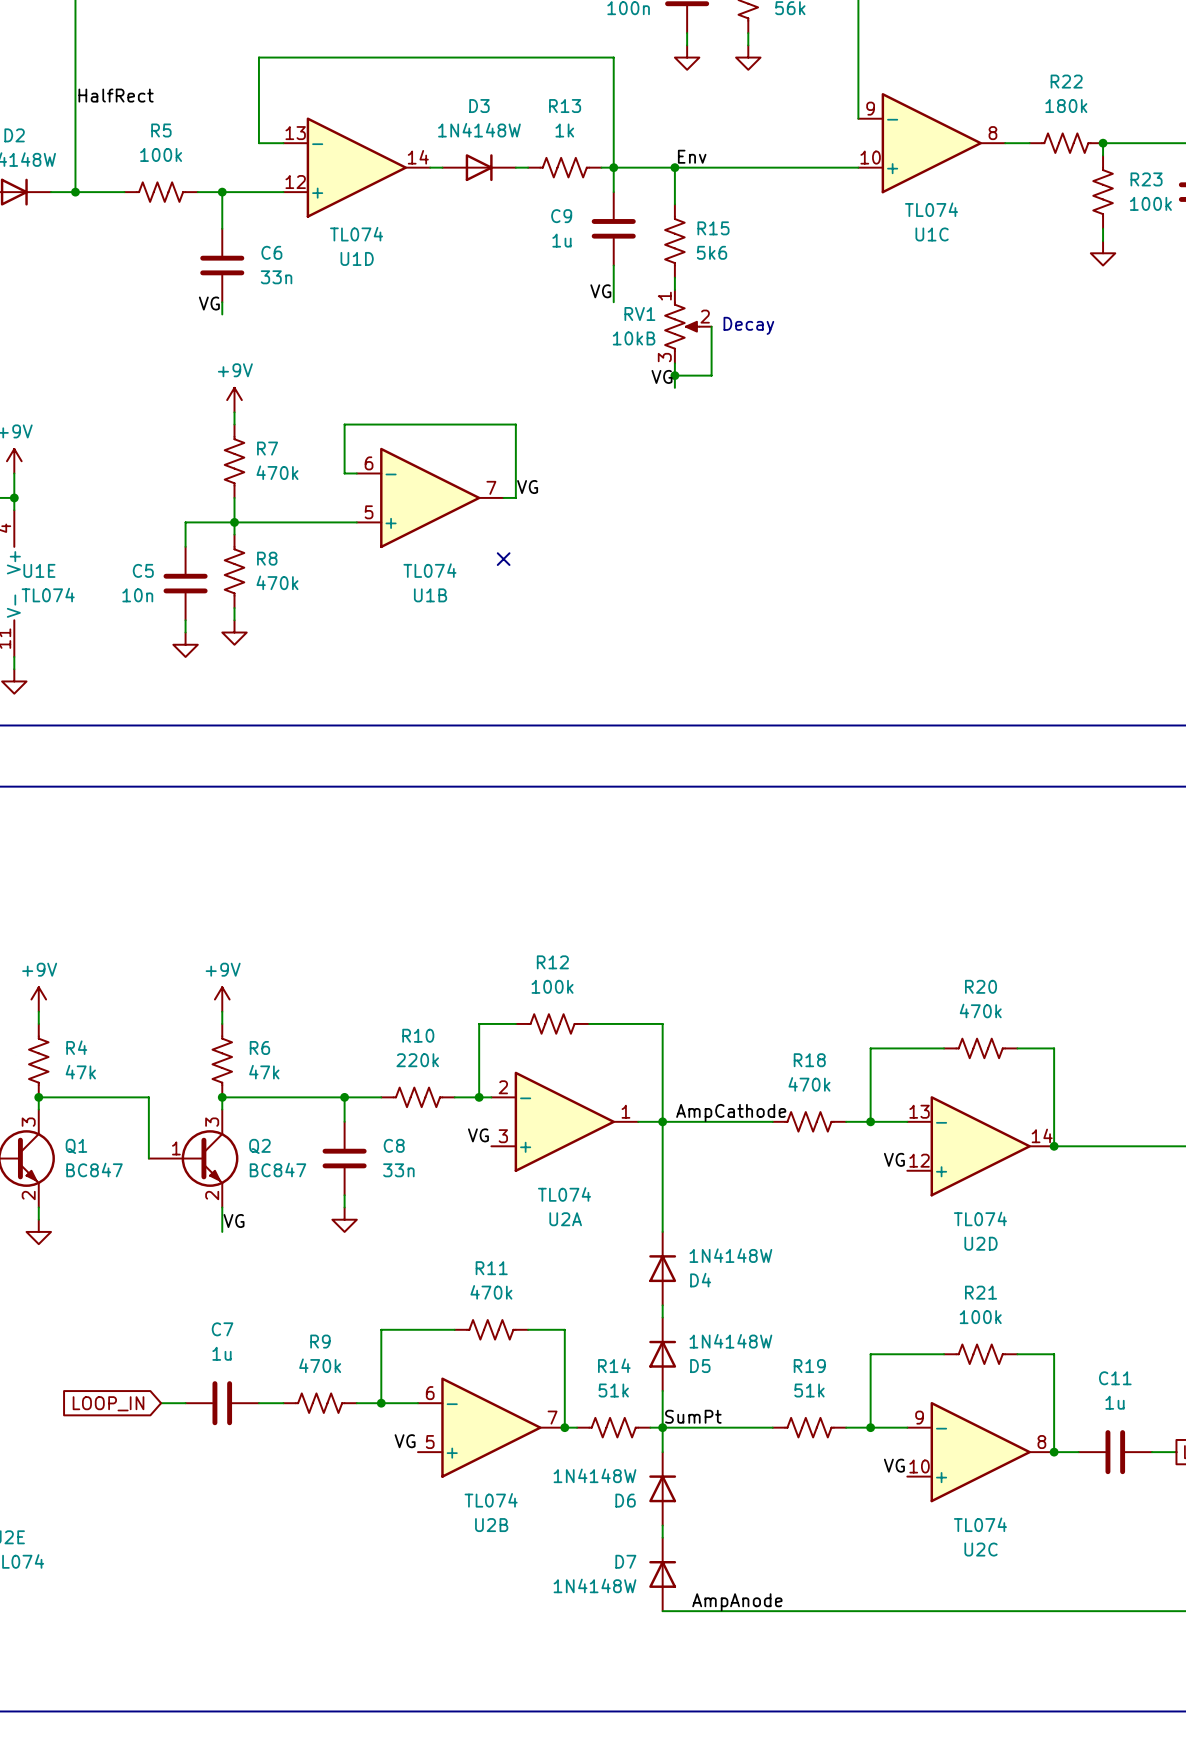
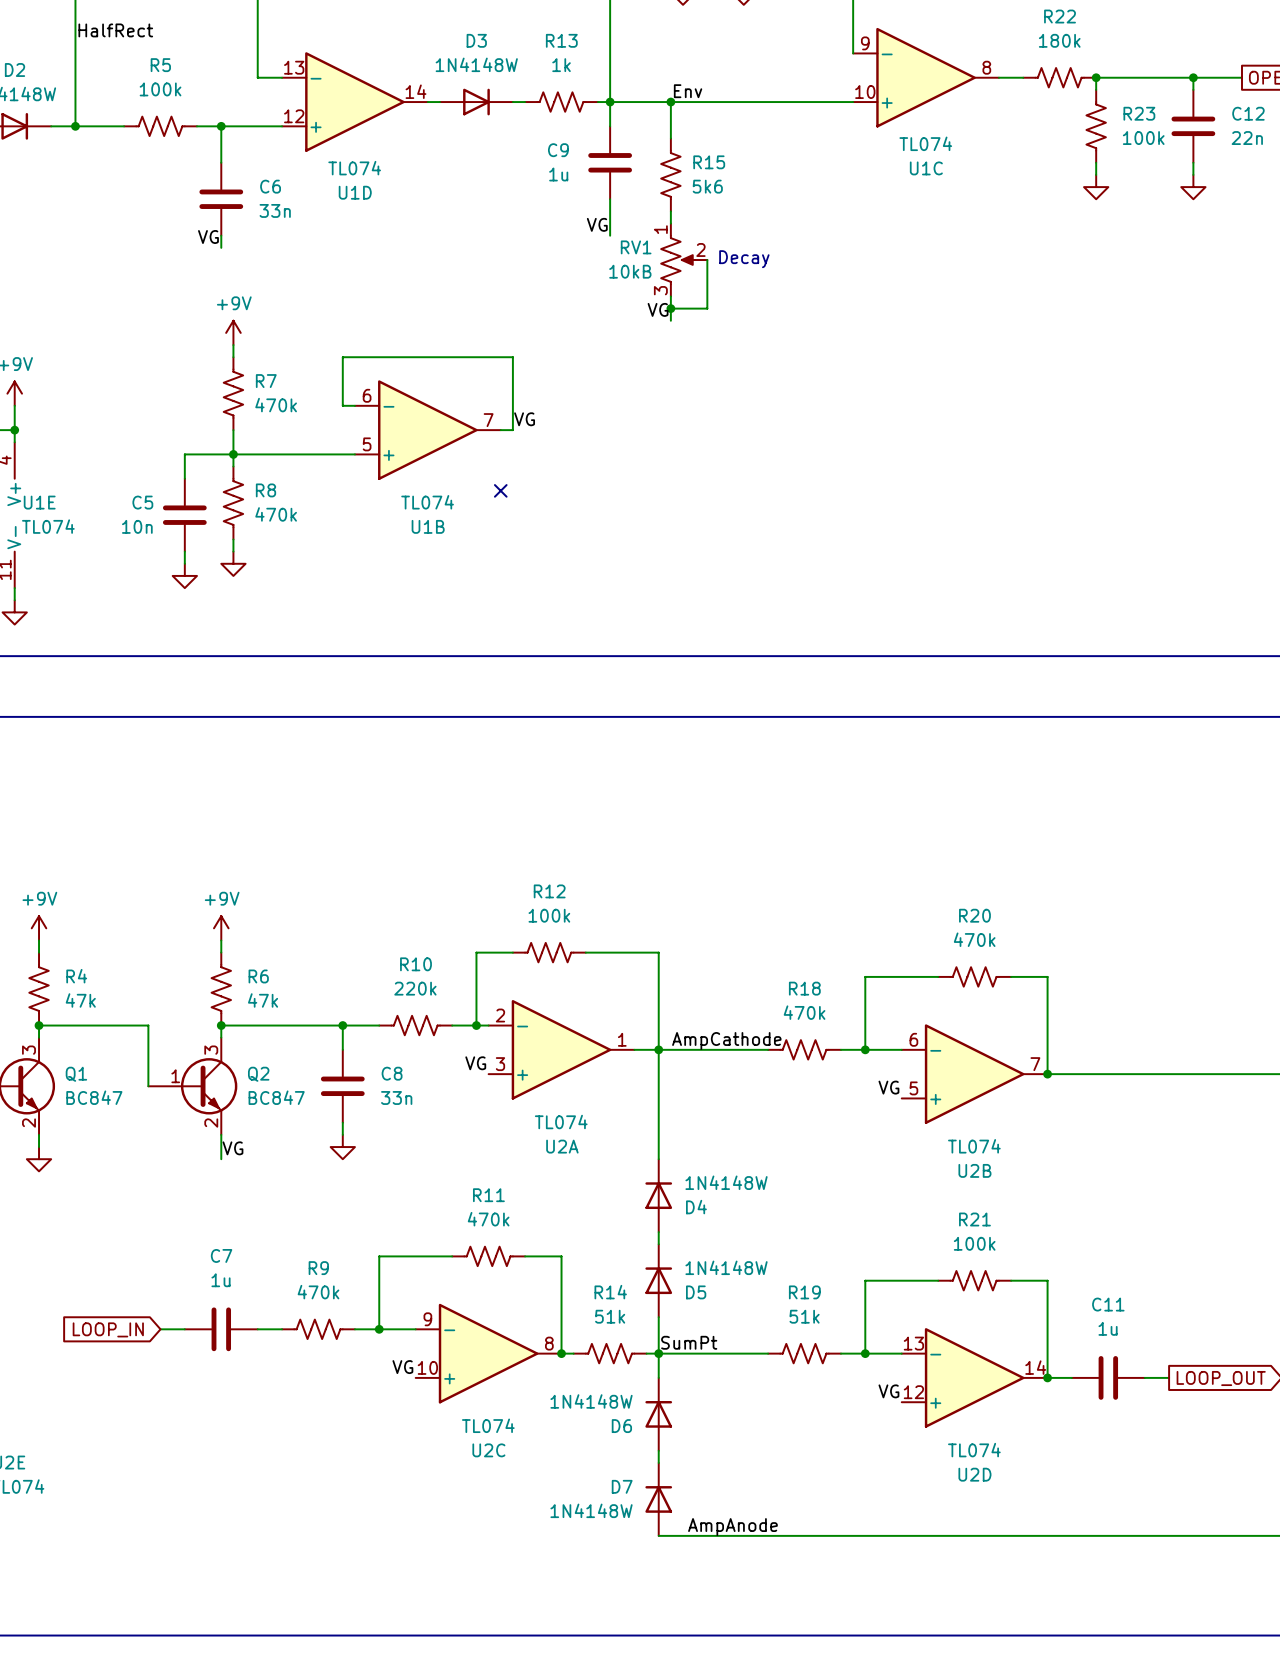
U2D position: (980, 1146) -> (974, 1377)
U2B position: (491, 1427) -> (974, 1074)
U2C position: (980, 1452) -> (488, 1353)

